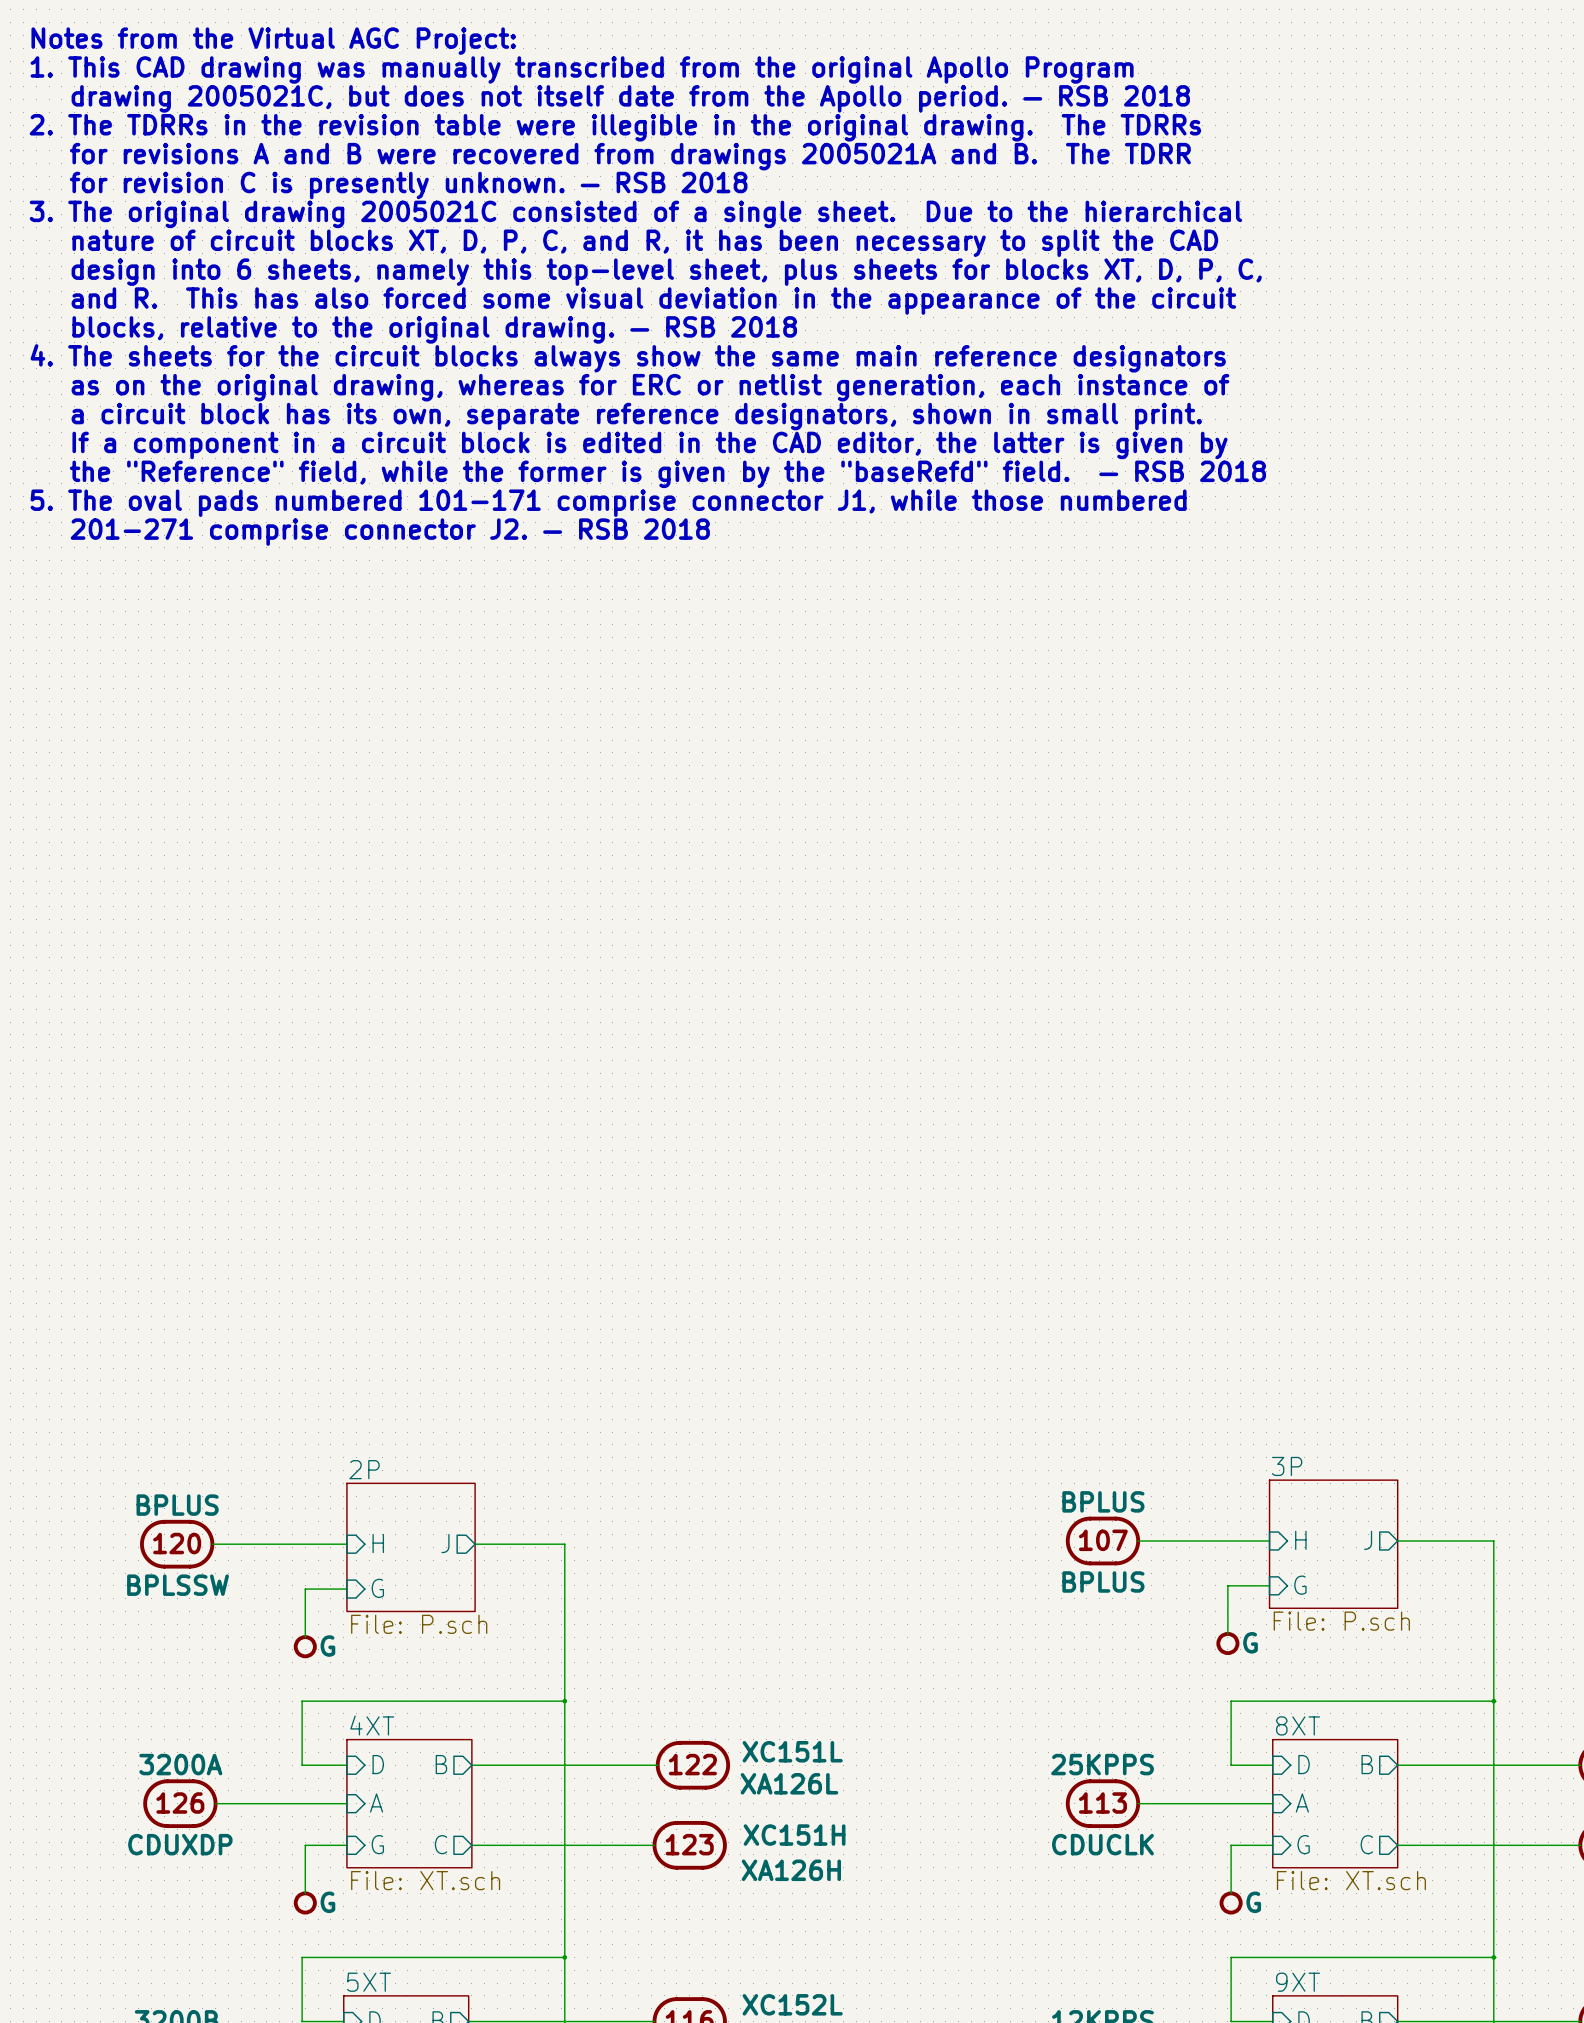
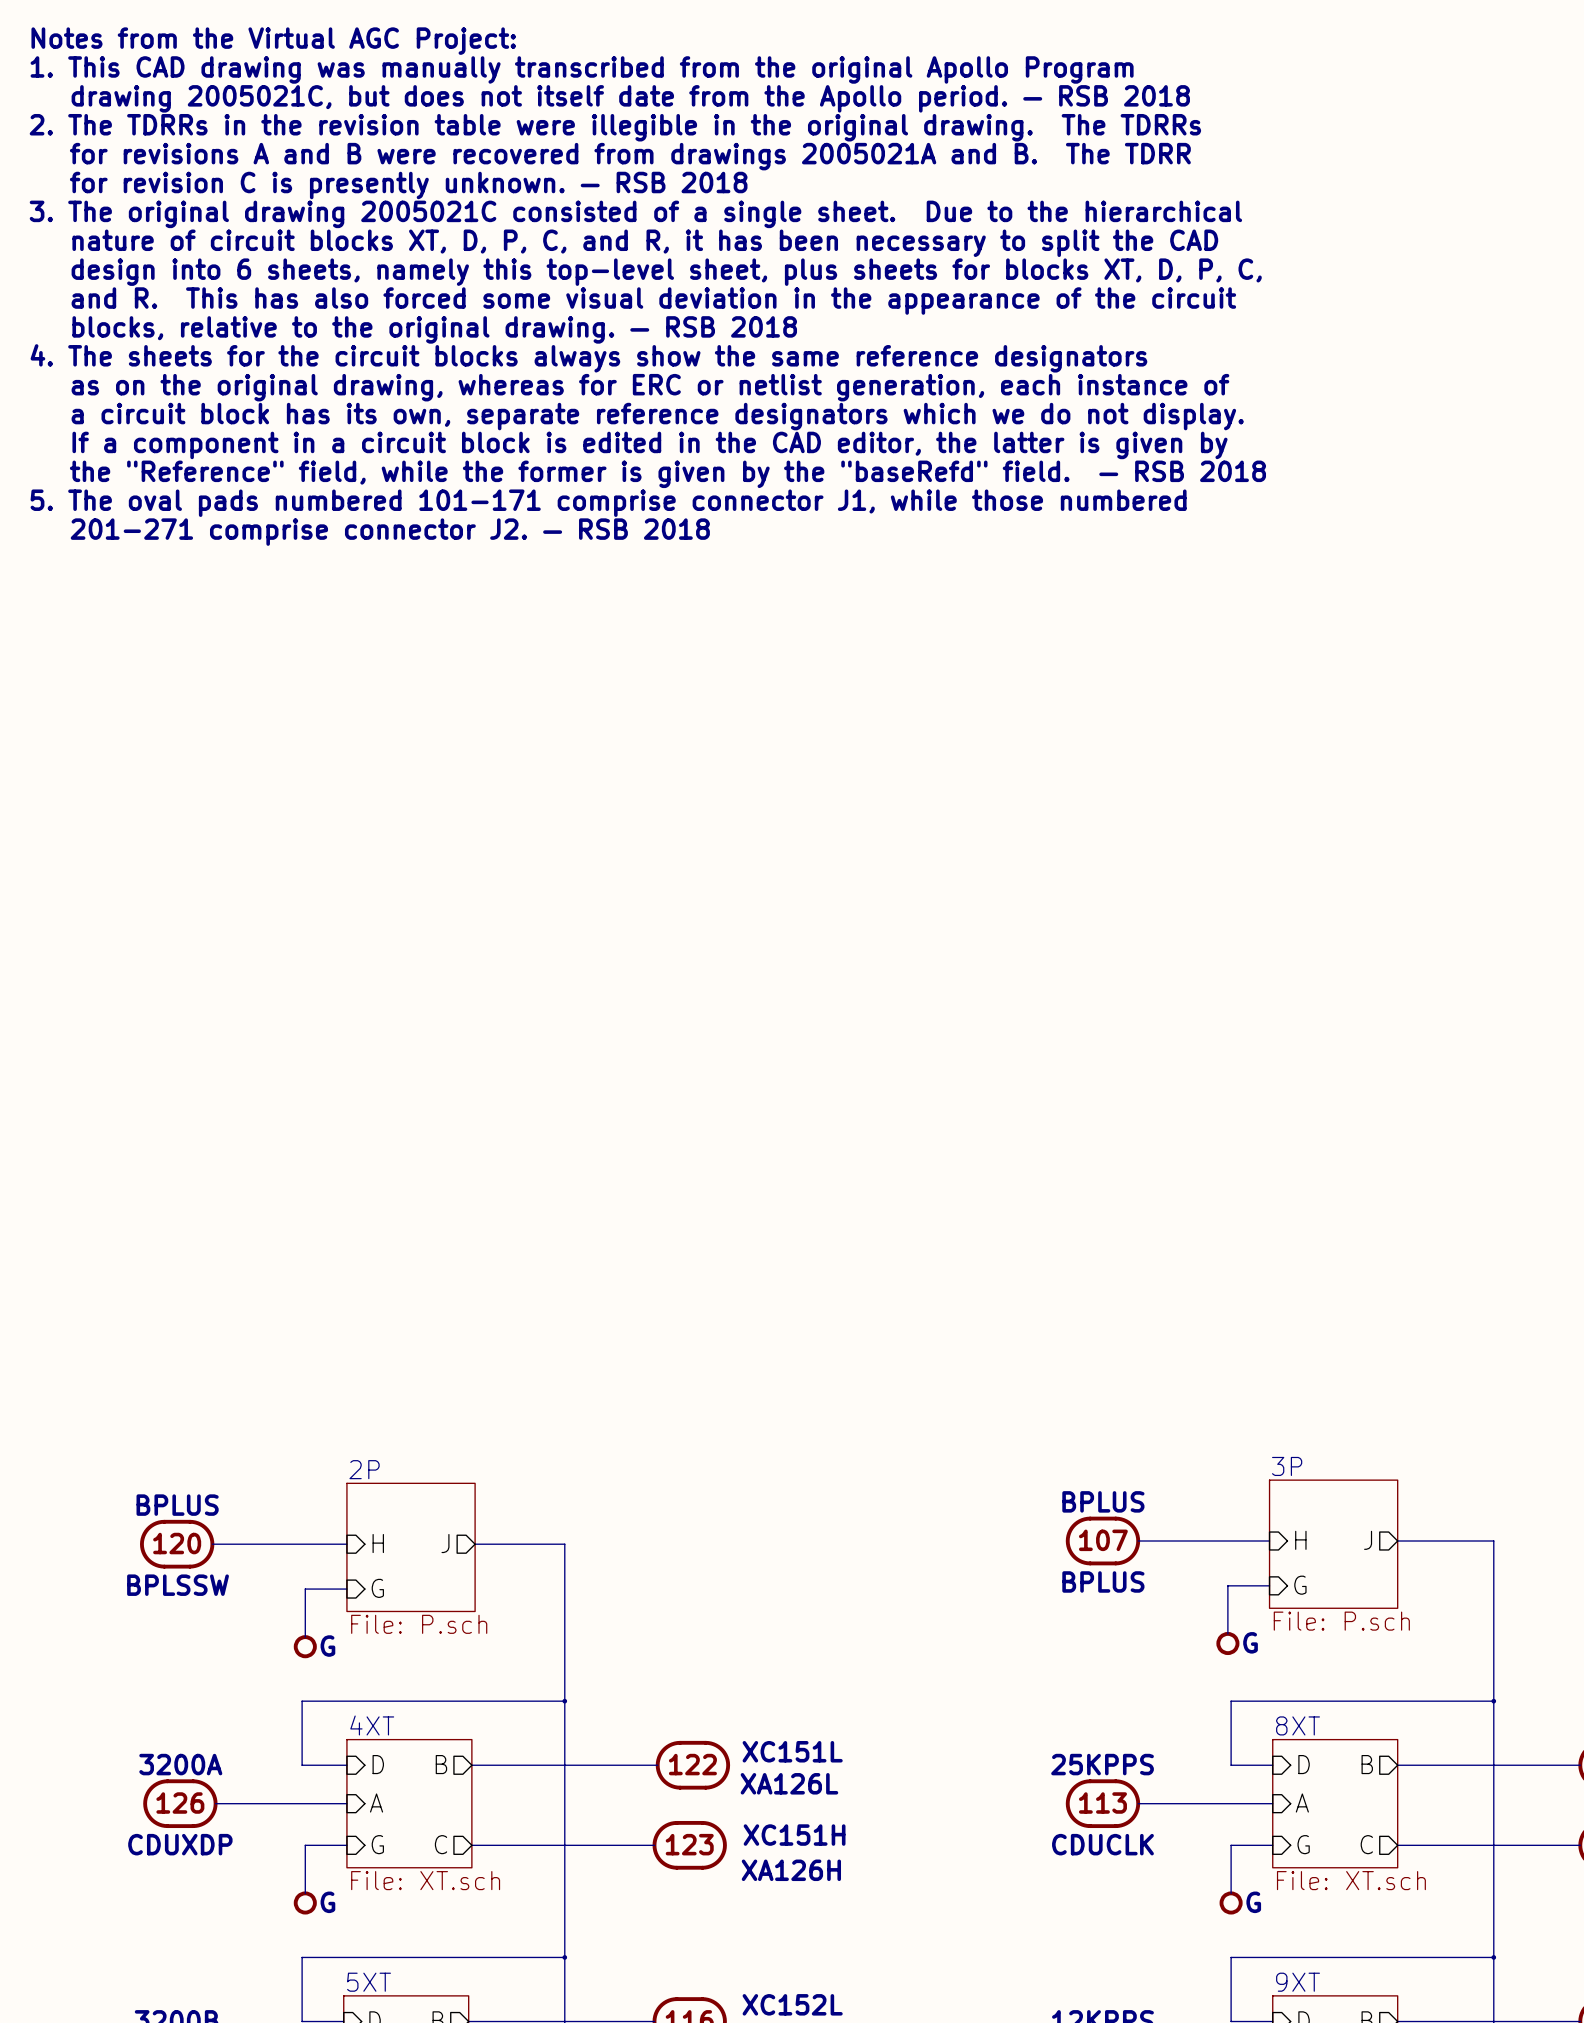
text: 4. The sheets for the circuit blocks always show the same main reference designators (628, 358) -> 4. The sheets for the circuit blocks always show the same reference designators (588, 358)
text: a circuit block has its own, separate reference designators, shown in small print. (636, 416) -> a circuit block has its own, separate reference designators which we do not display. (657, 416)

